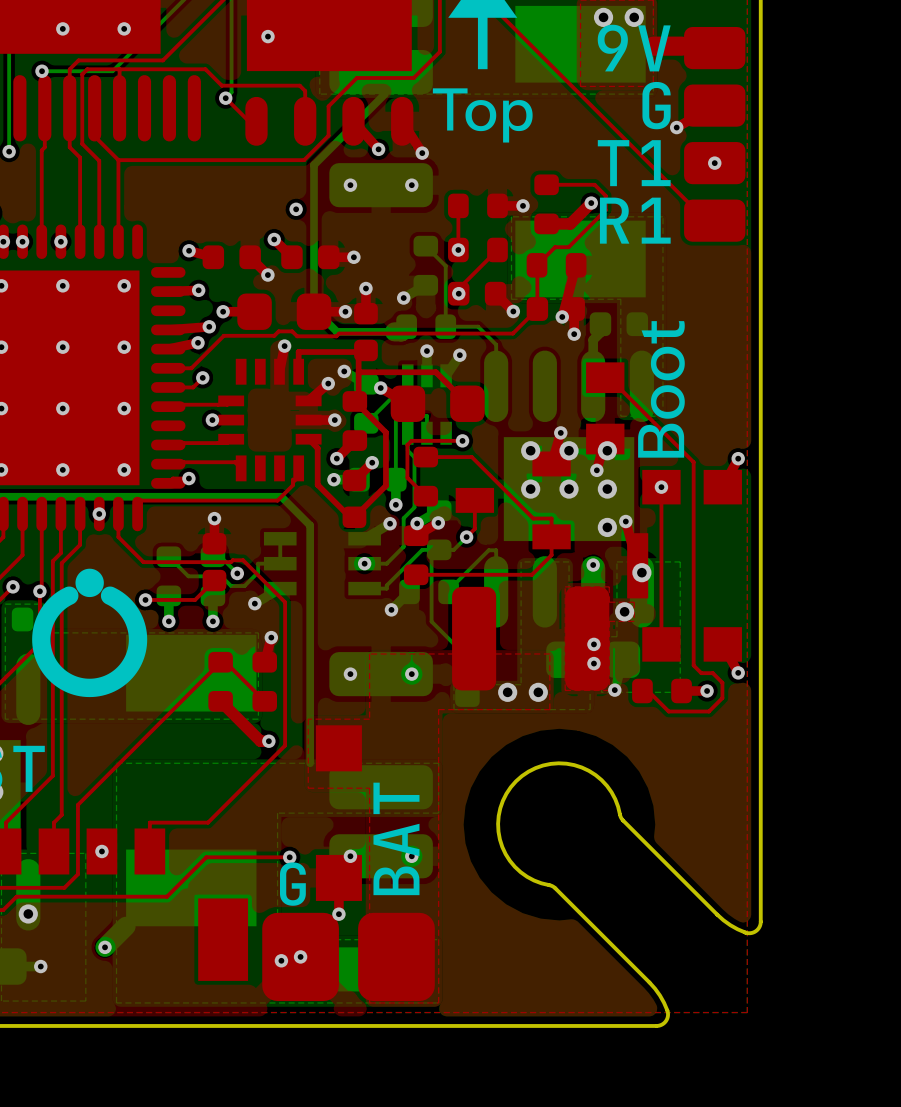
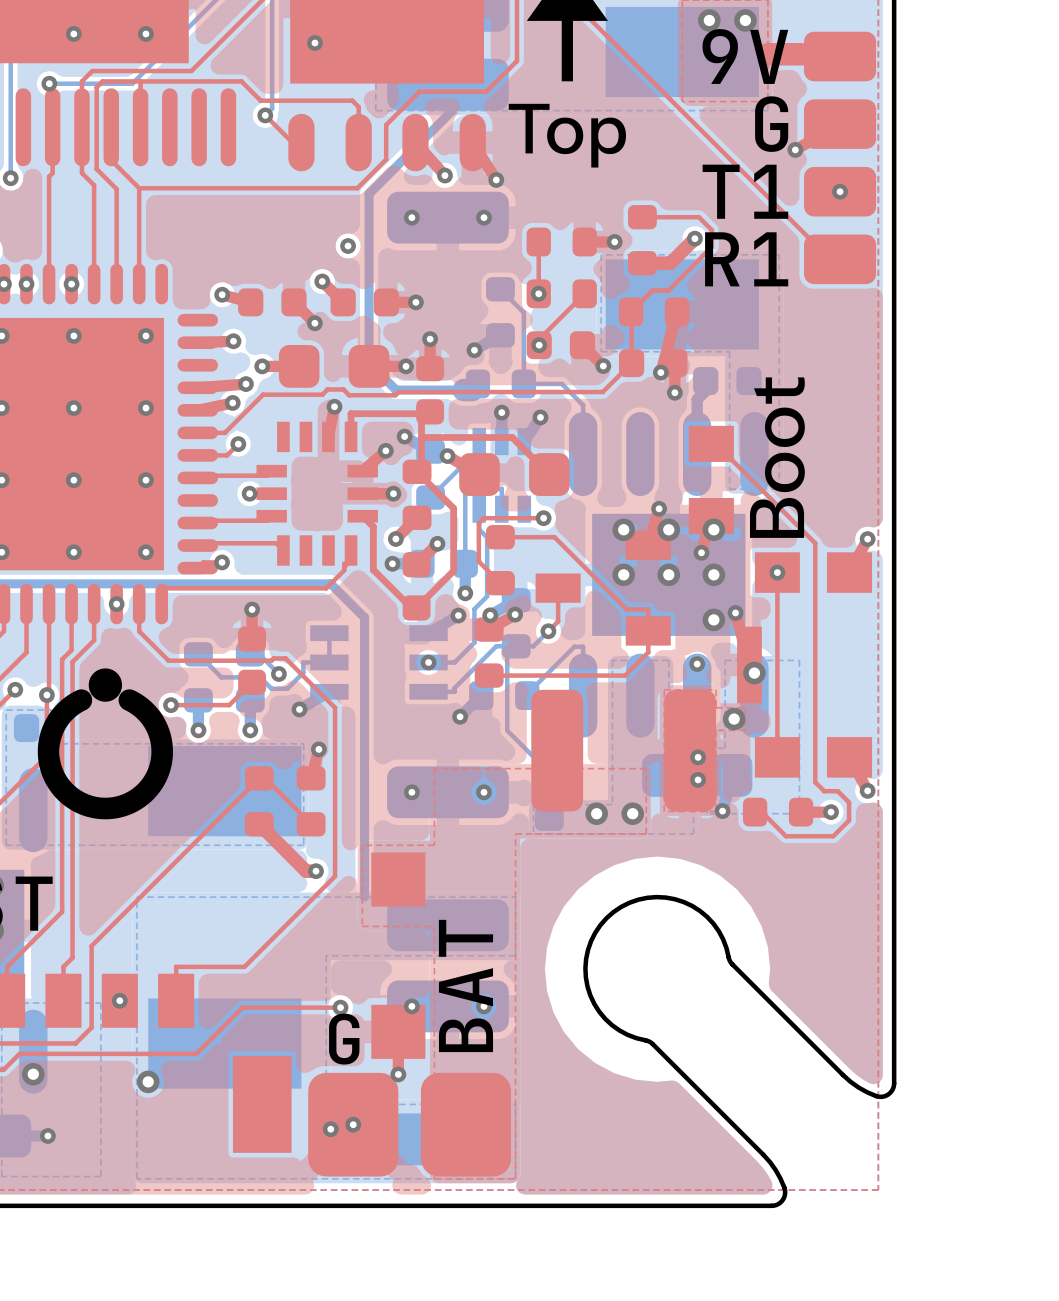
via: none -> (148, 1081)
bottom track: (126, 926) (105, 947) -> none
via: (105, 947) -> none

